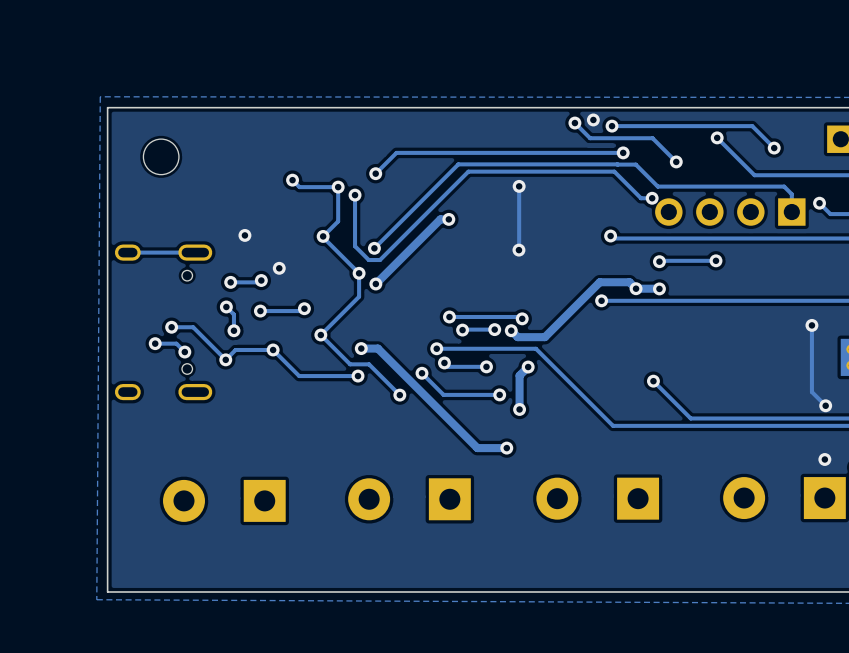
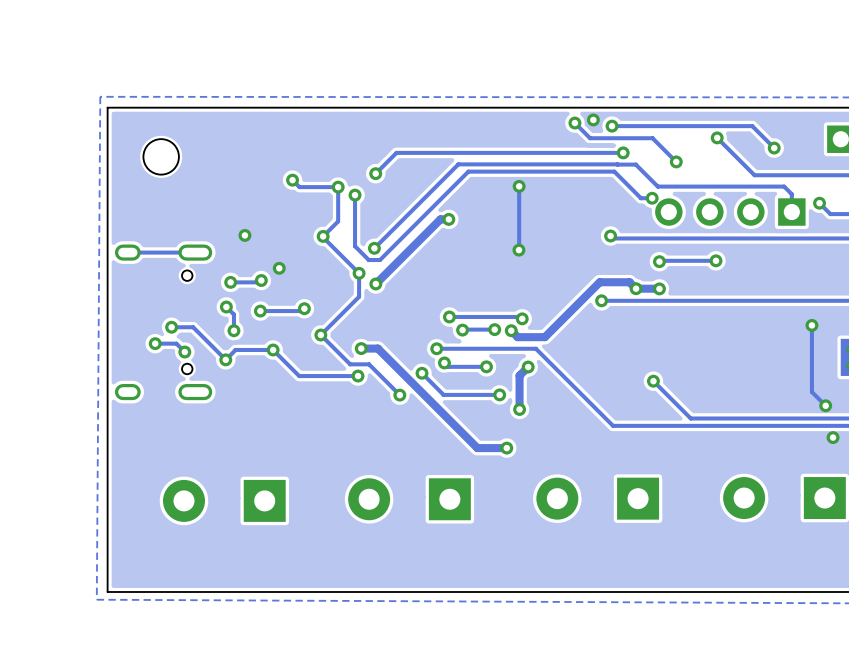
via: none -> (833, 437)
via: (824, 459) -> none

